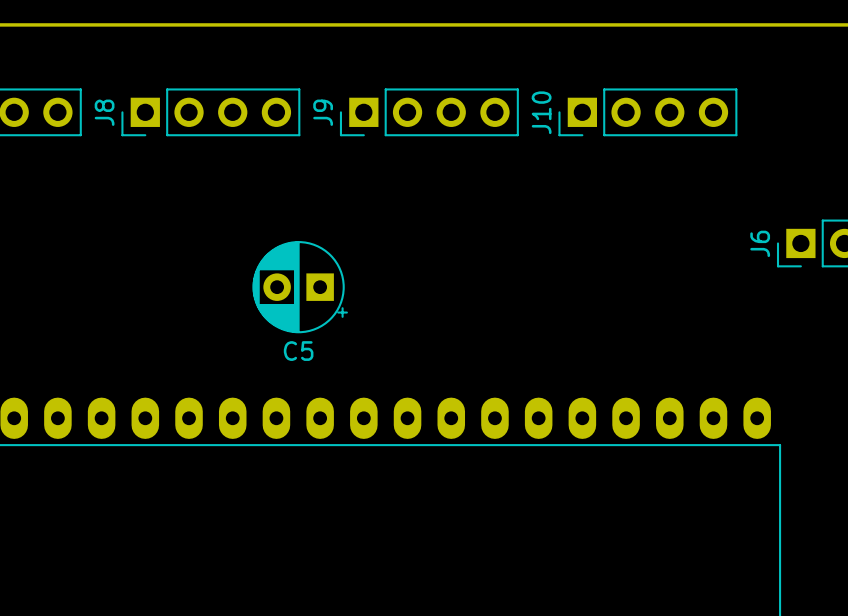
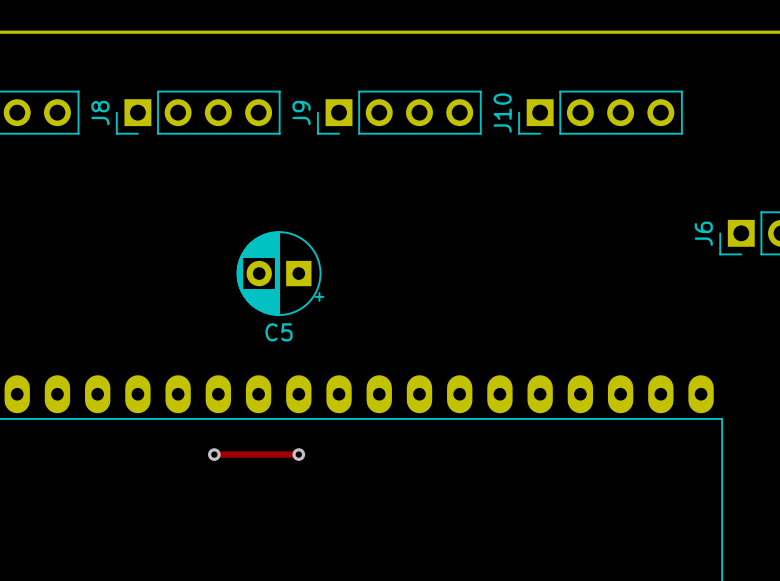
track: none -> (214, 454) (298, 454)
via: none -> (214, 454)
via: none -> (298, 454)

